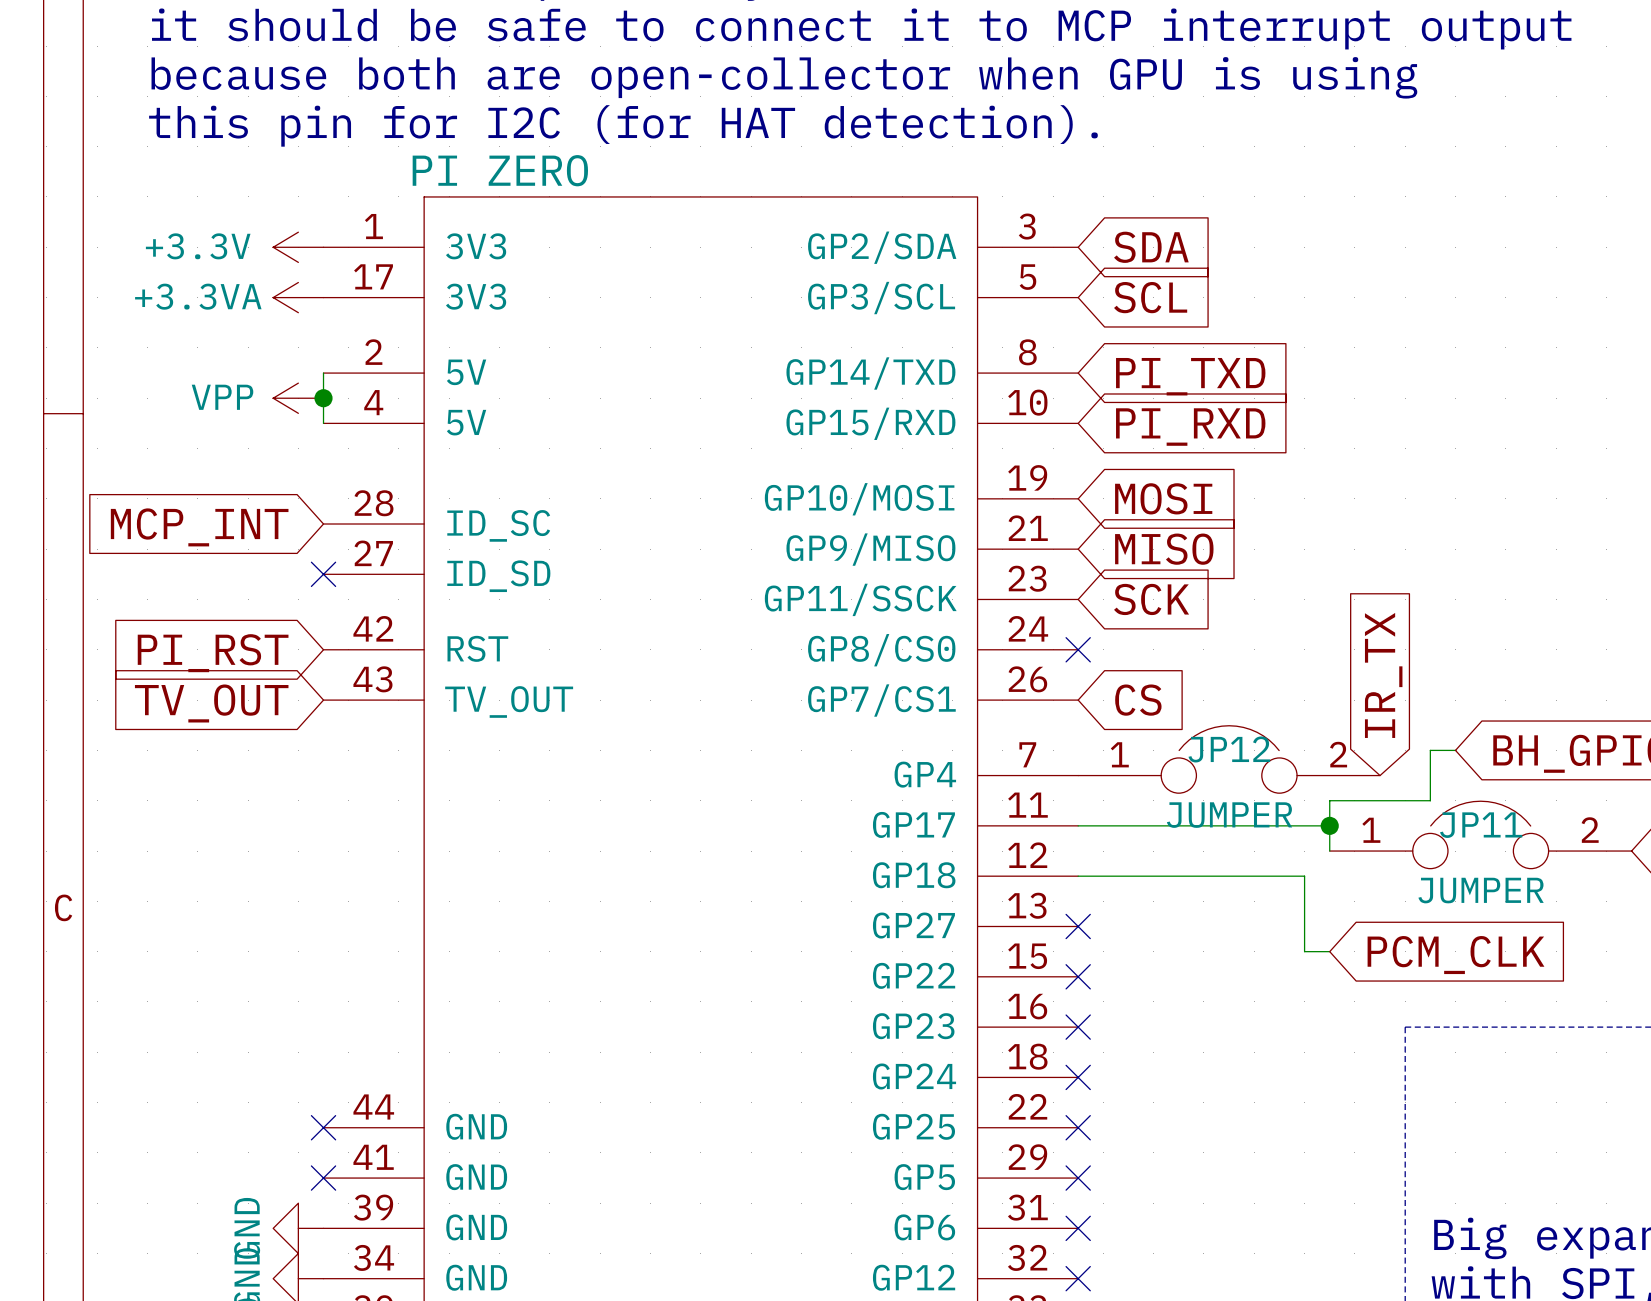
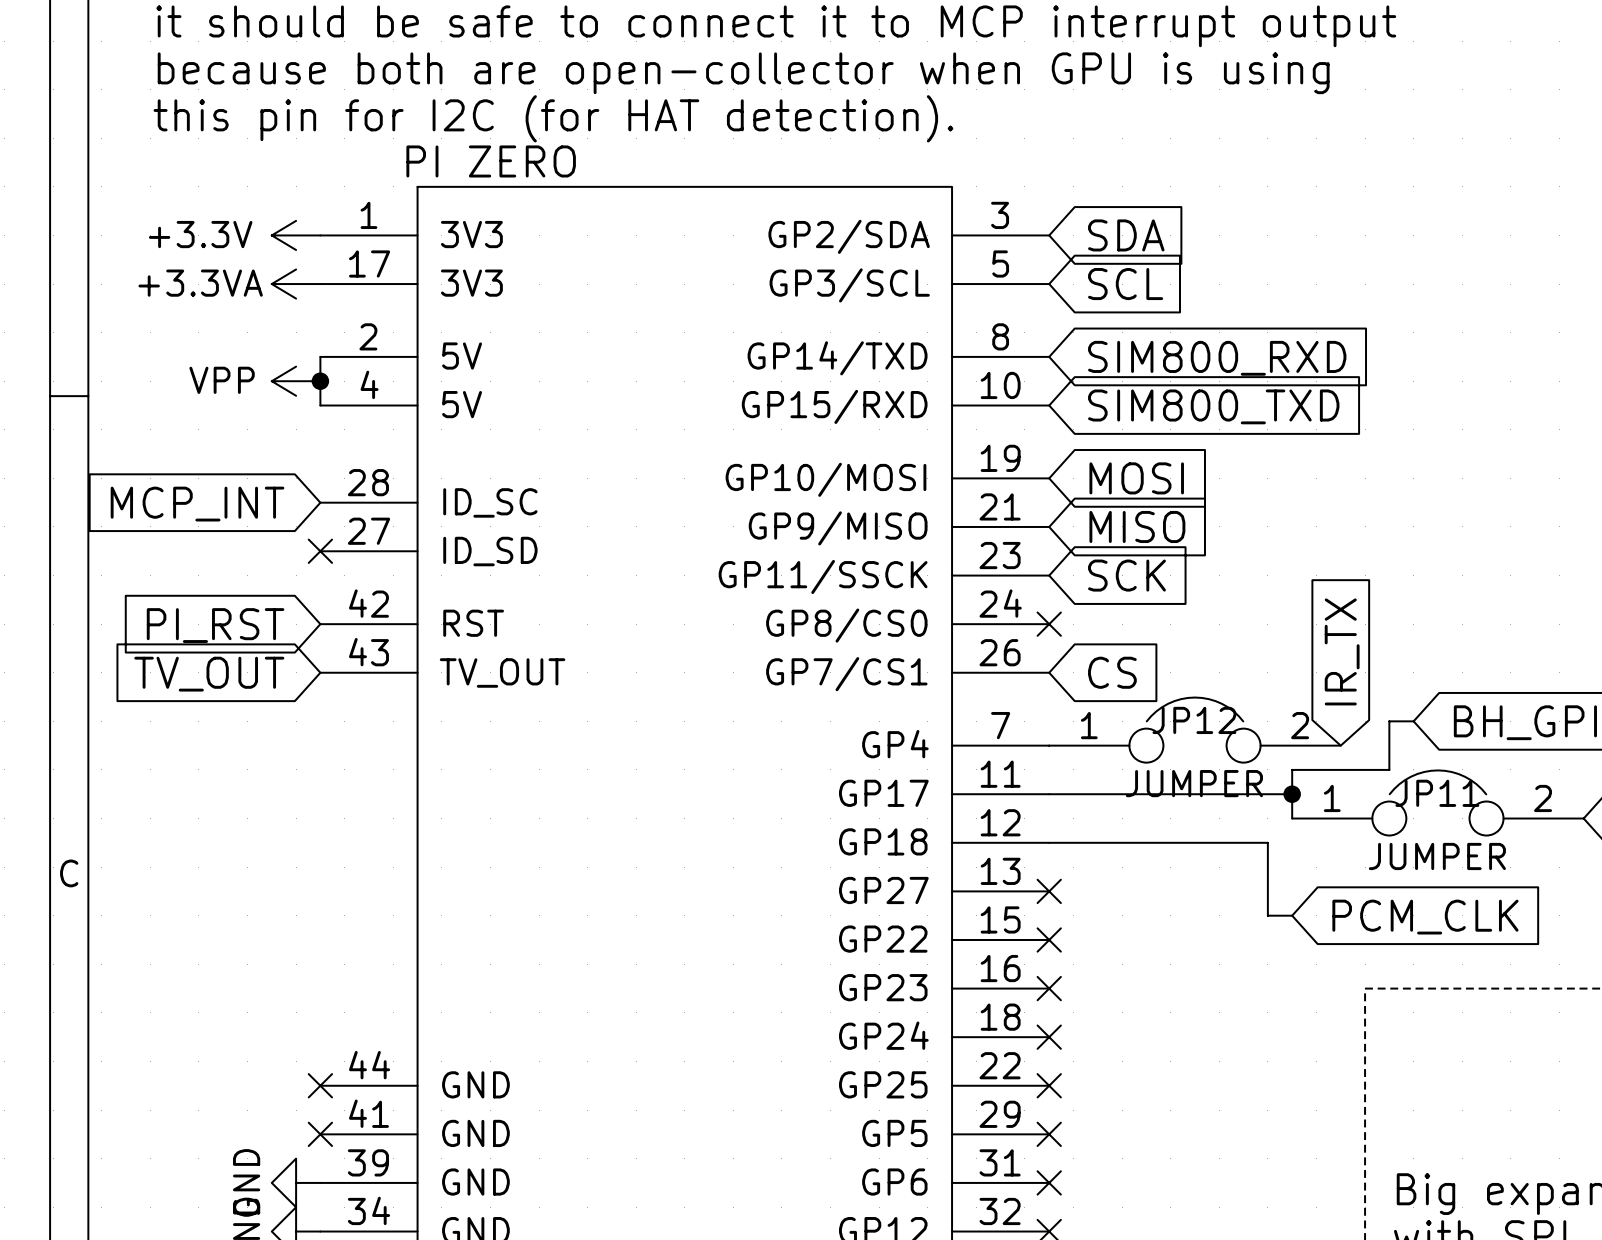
global label: PI_TXD (1190, 376) -> SIM800_RXD (1217, 358)
global label: PI_RXD (1190, 427) -> SIM800_TXD (1213, 406)

